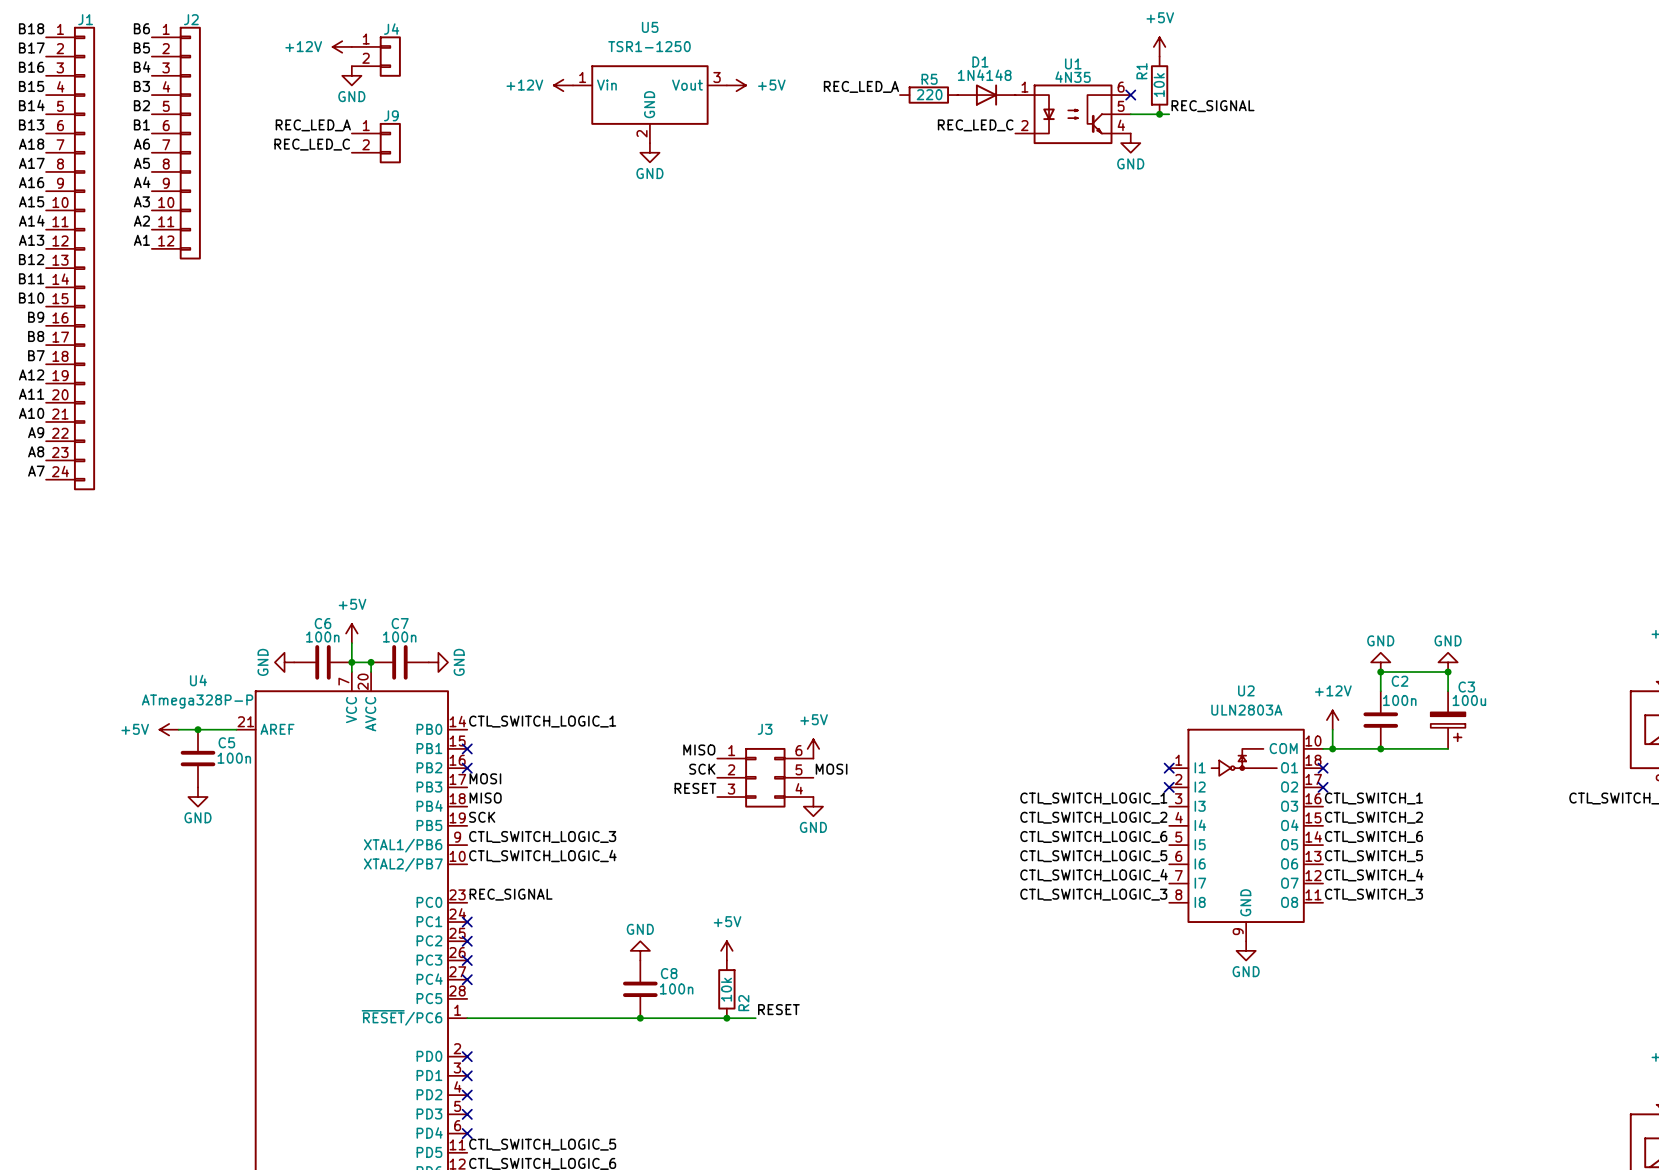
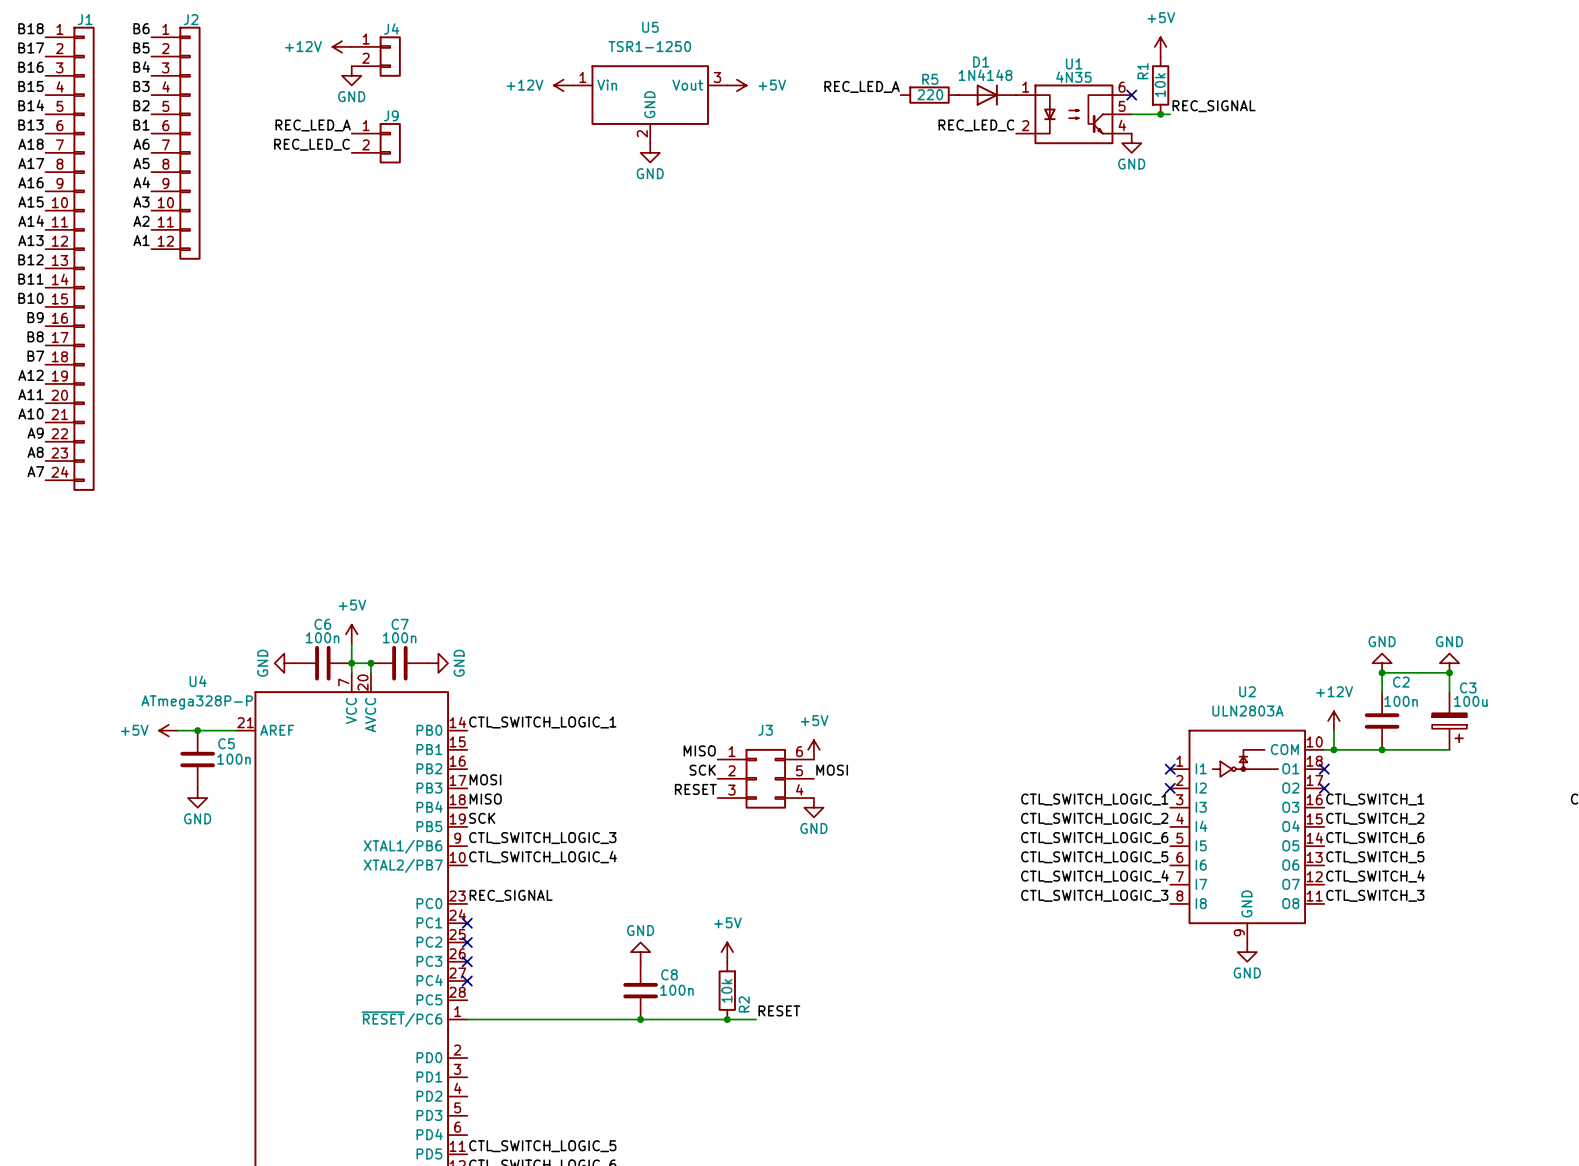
no-connect mark: (467, 748) -> none
no-connect mark: (467, 768) -> none
no-connect mark: (467, 1056) -> none
no-connect mark: (467, 1075) -> none
no-connect mark: (467, 1095) -> none
no-connect mark: (467, 1114) -> none
no-connect mark: (467, 1133) -> none

